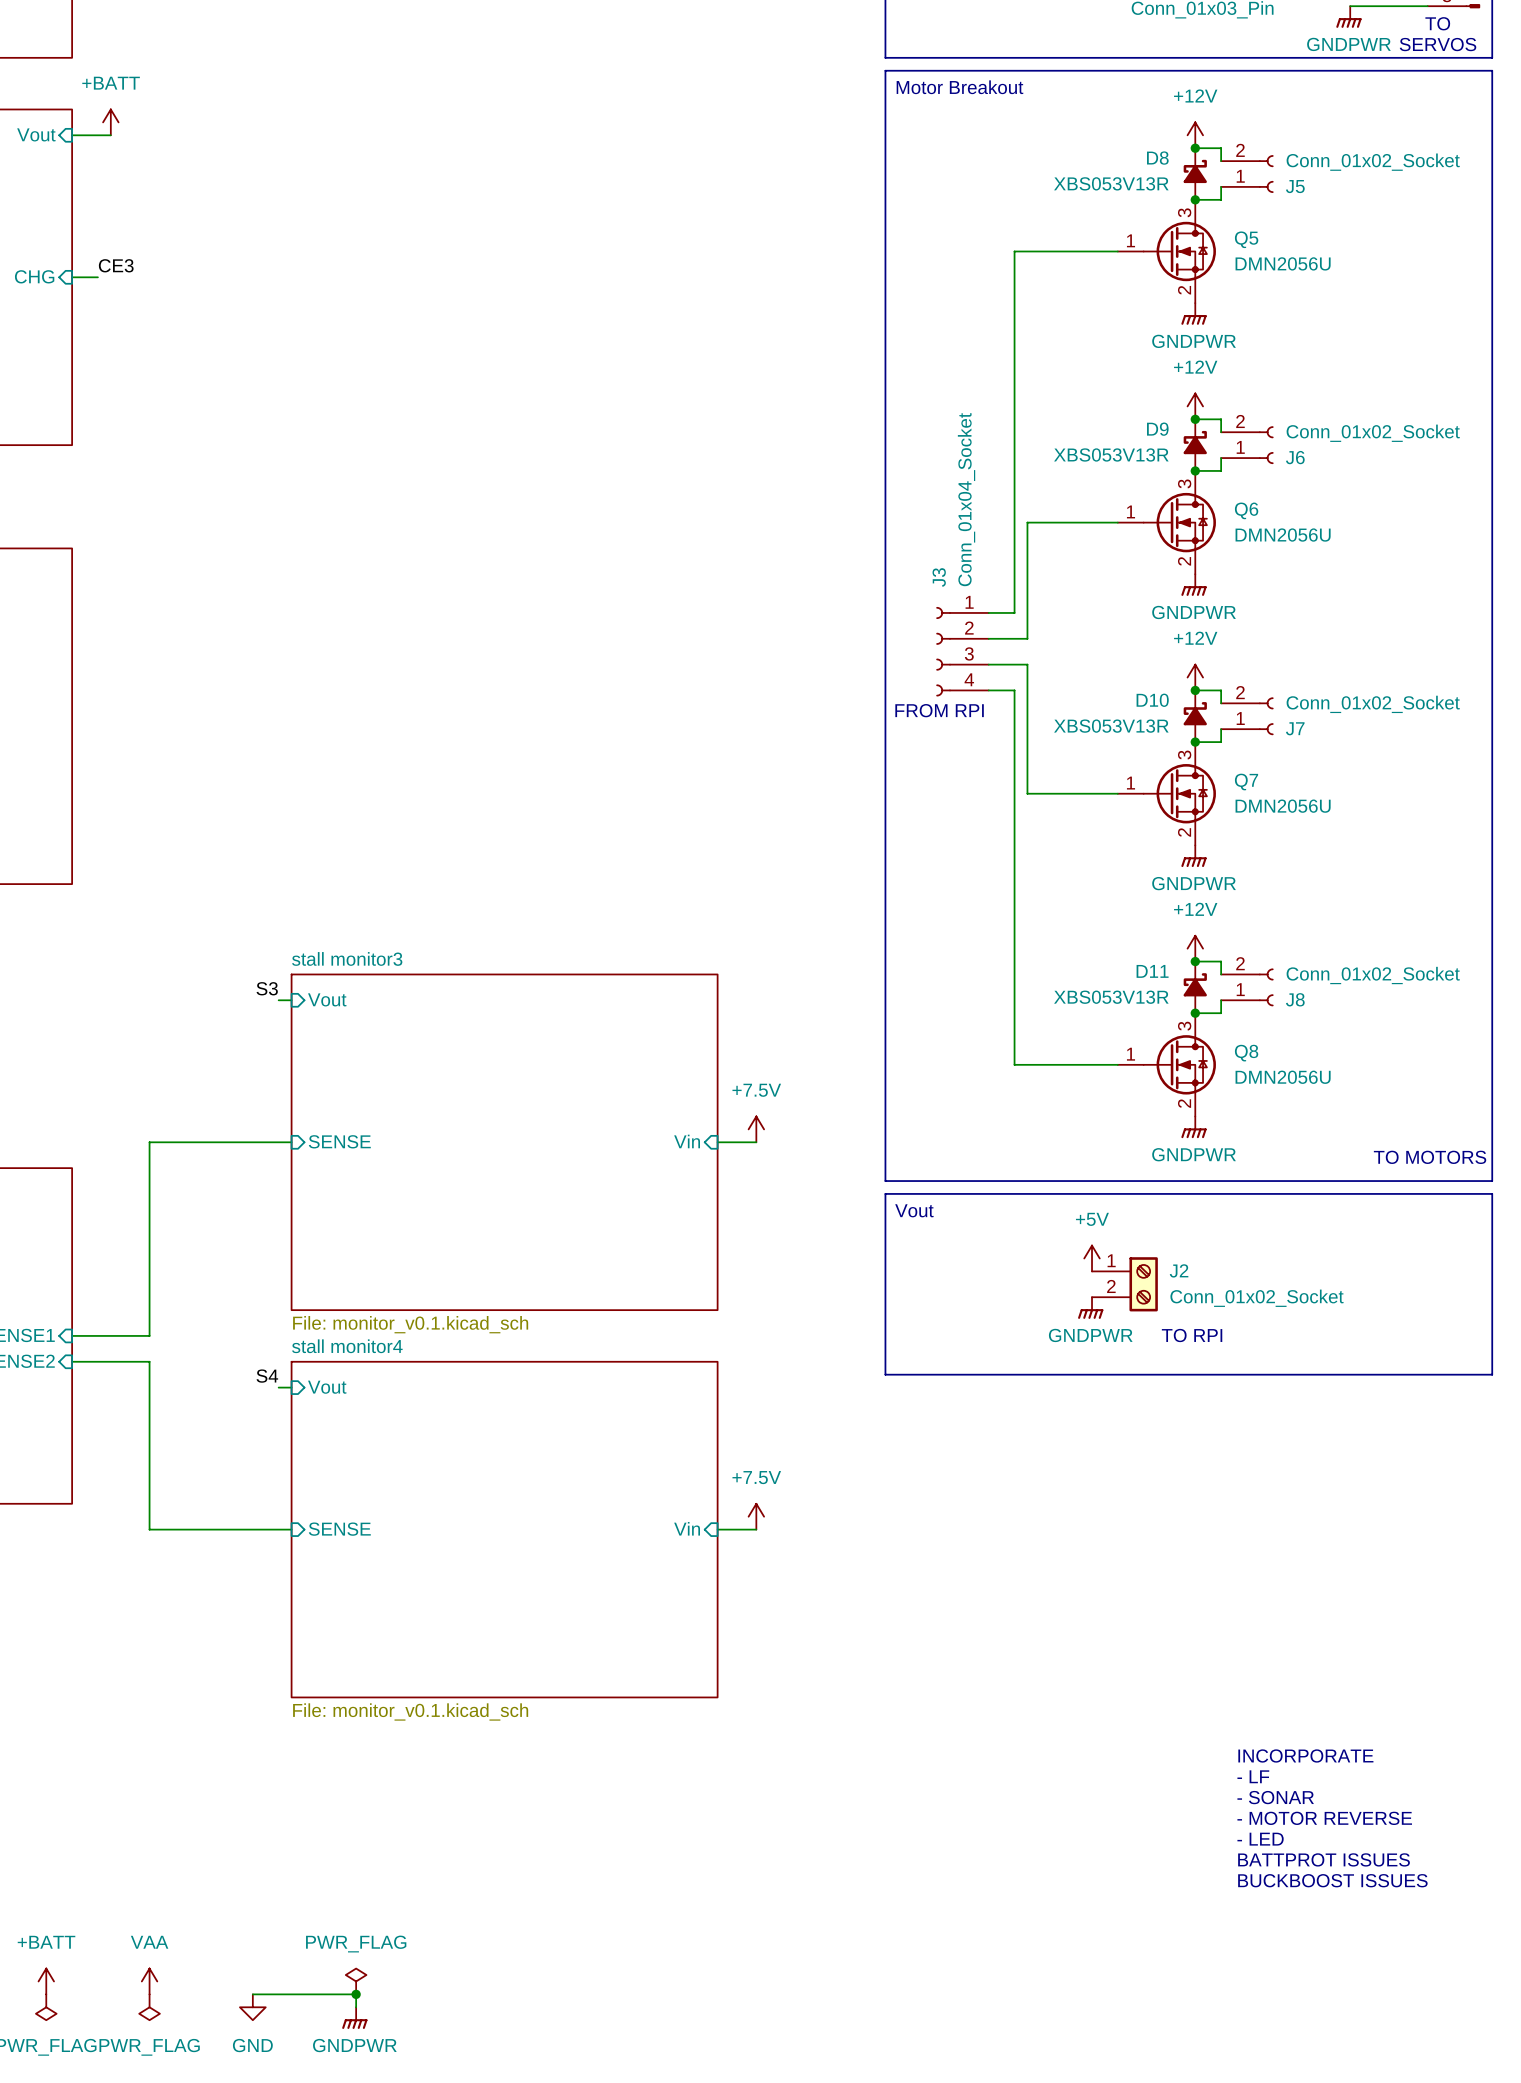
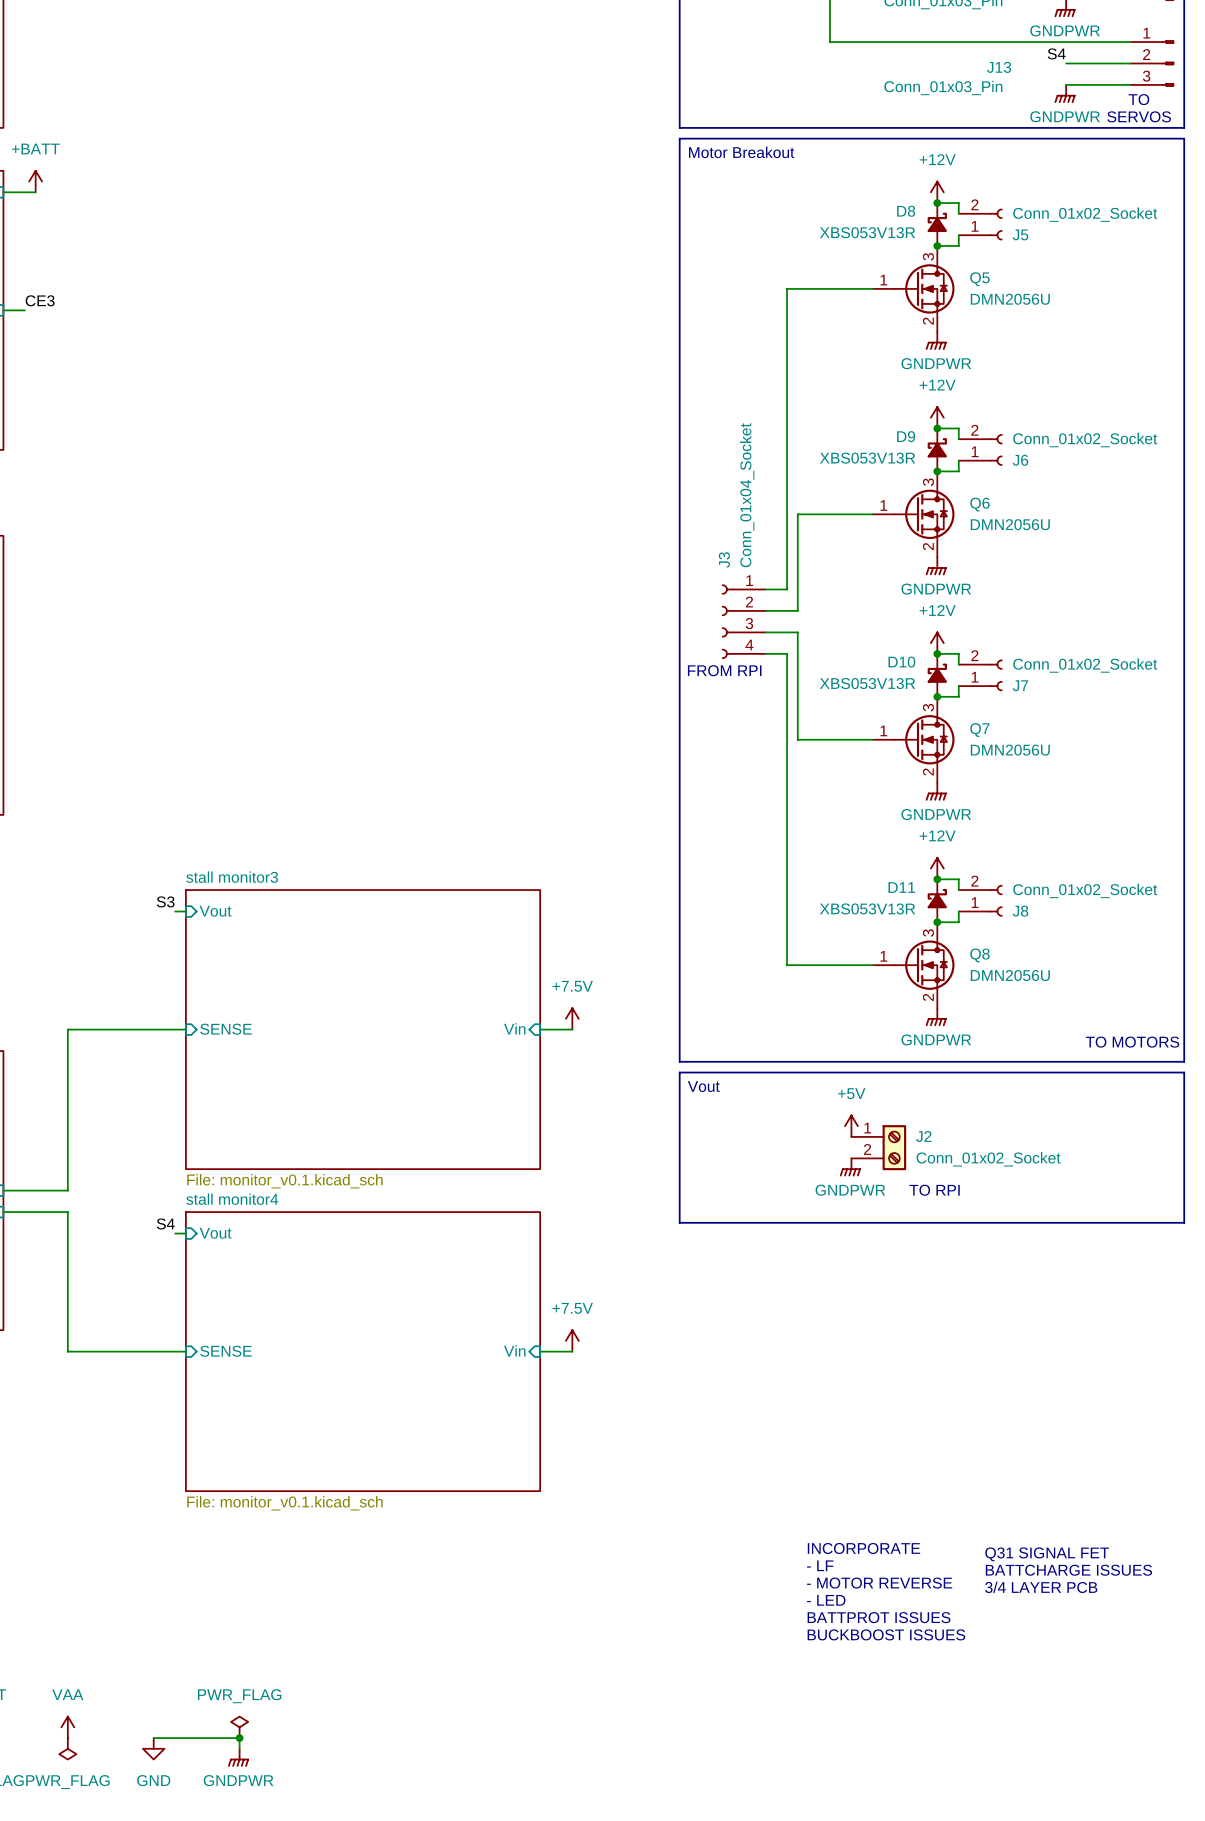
text position: INCORPORATE (1305, 1755) -> INCORPORATE (863, 1548)
text: none -> Q31 SIGNAL FET (1047, 1554)
text position: - LF (1253, 1776) -> - LF (820, 1565)
text: none -> BATTCHARGE ISSUES (1068, 1570)
text: - SONAR (1275, 1797) -> none
text: none -> 3/4 LAYER PCB (1041, 1587)
text position: - MOTOR REVERSE (1324, 1818) -> - MOTOR REVERSE (879, 1583)
text position: - LED (1260, 1839) -> - LED (826, 1600)
text position: BATTPROT ISSUES (1324, 1859) -> BATTPROT ISSUES (879, 1617)
text position: BUCKBOOST ISSUES (1332, 1880) -> BUCKBOOST ISSUES (886, 1634)

